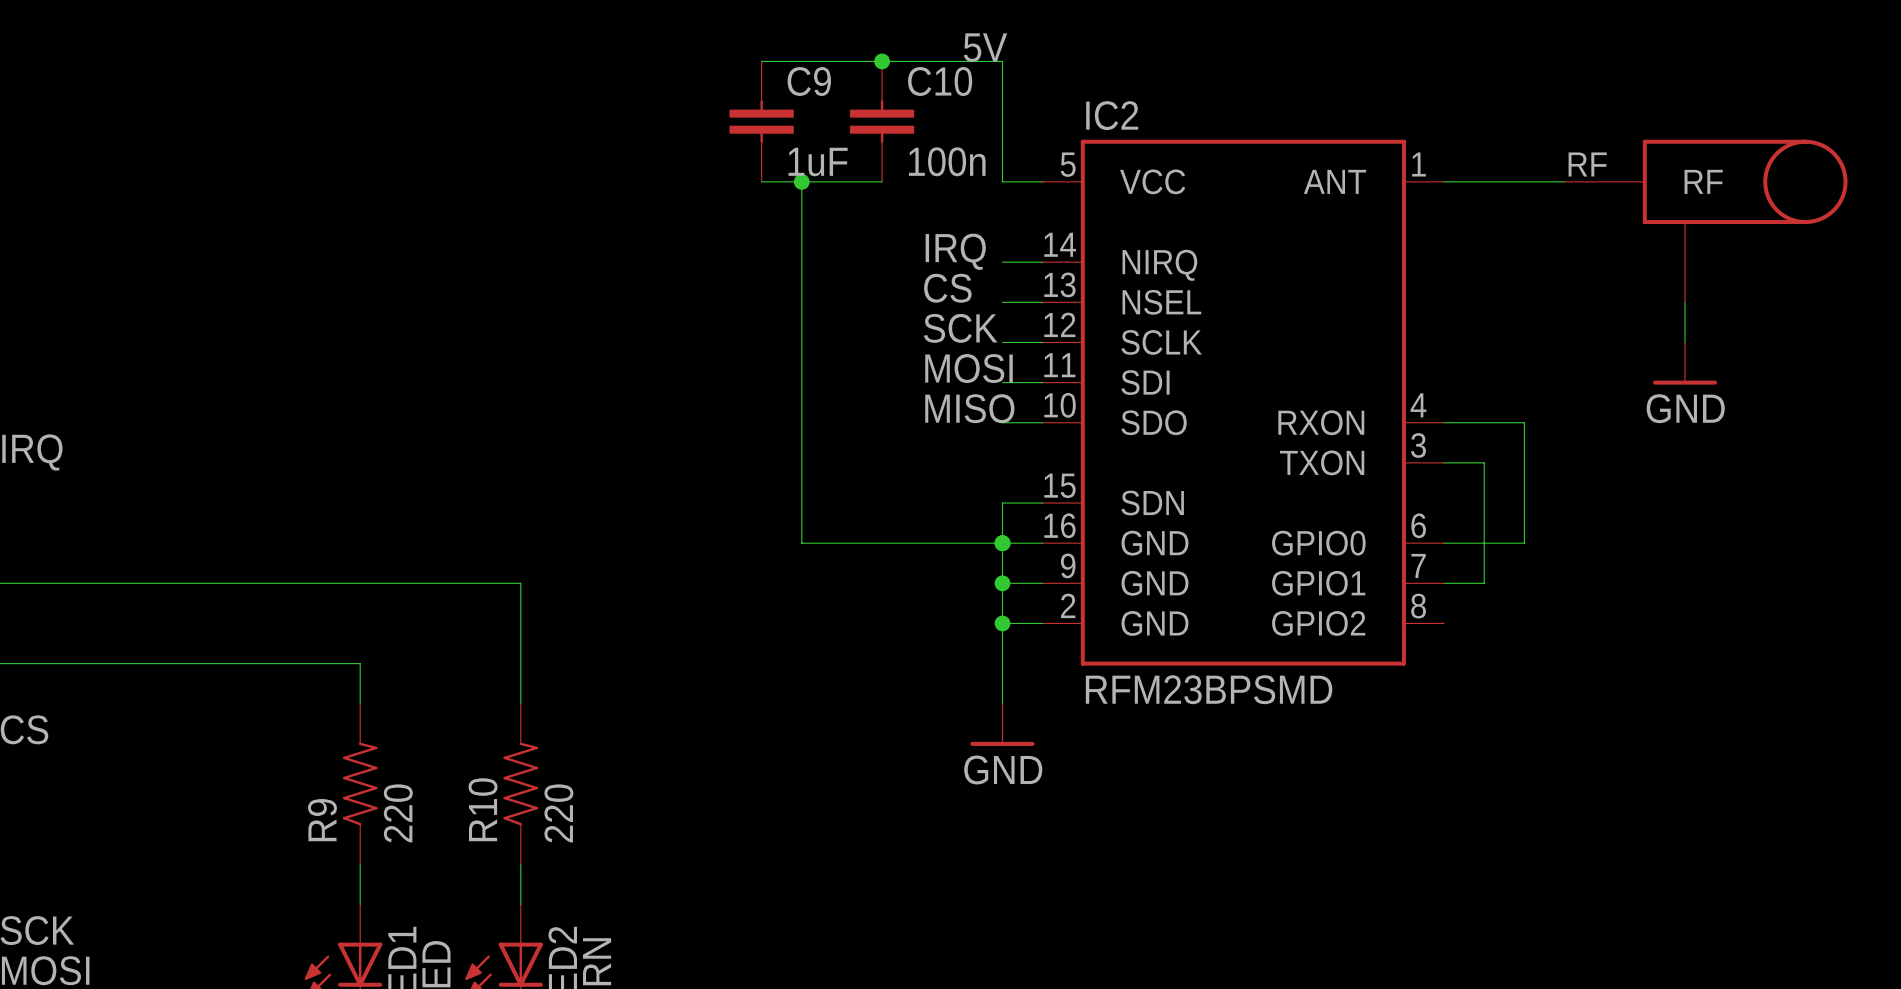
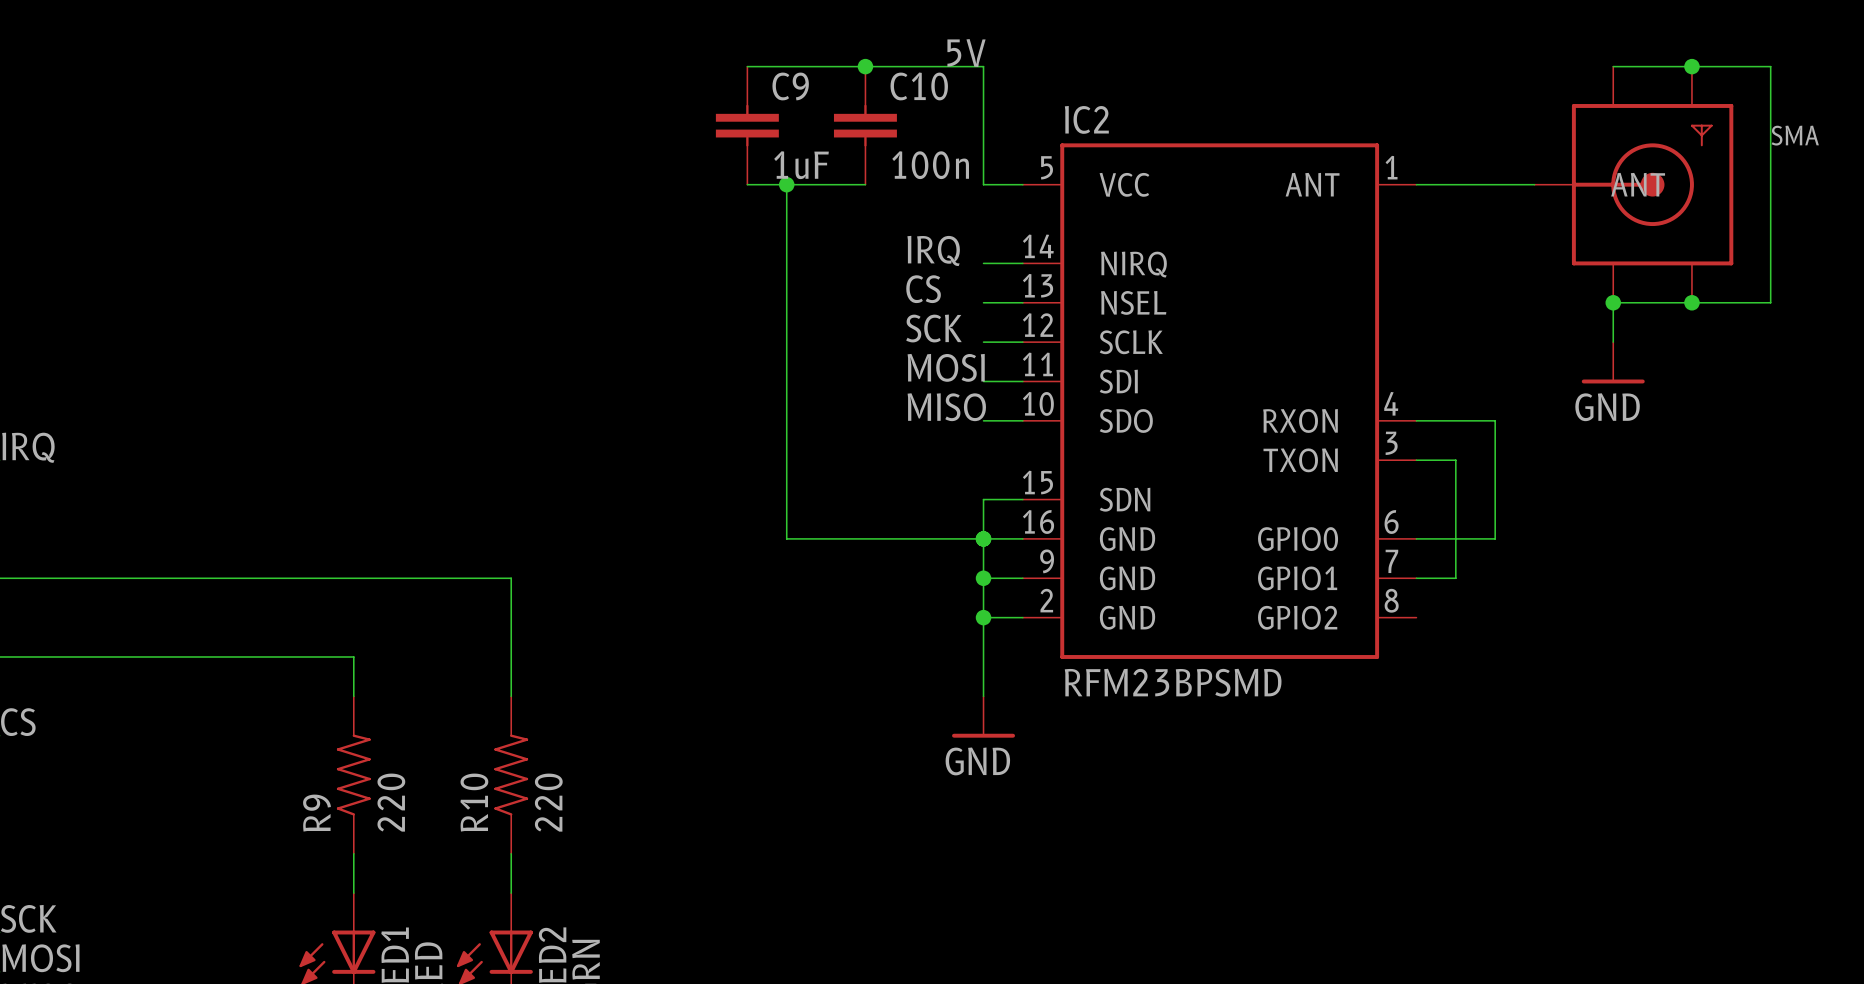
wire: none -> (1613, 66) (1770, 66) (1770, 302) (1613, 302) (1613, 342)
junction: none -> (1691, 66)
SMA: none -> (1633, 184)
part: (1706, 221) -> none
junction: none -> (1613, 302)
wire: (1684, 302) (1684, 342) -> none
junction: none -> (1691, 302)
power symbol position: GND (1684, 363) -> GND (1613, 362)

